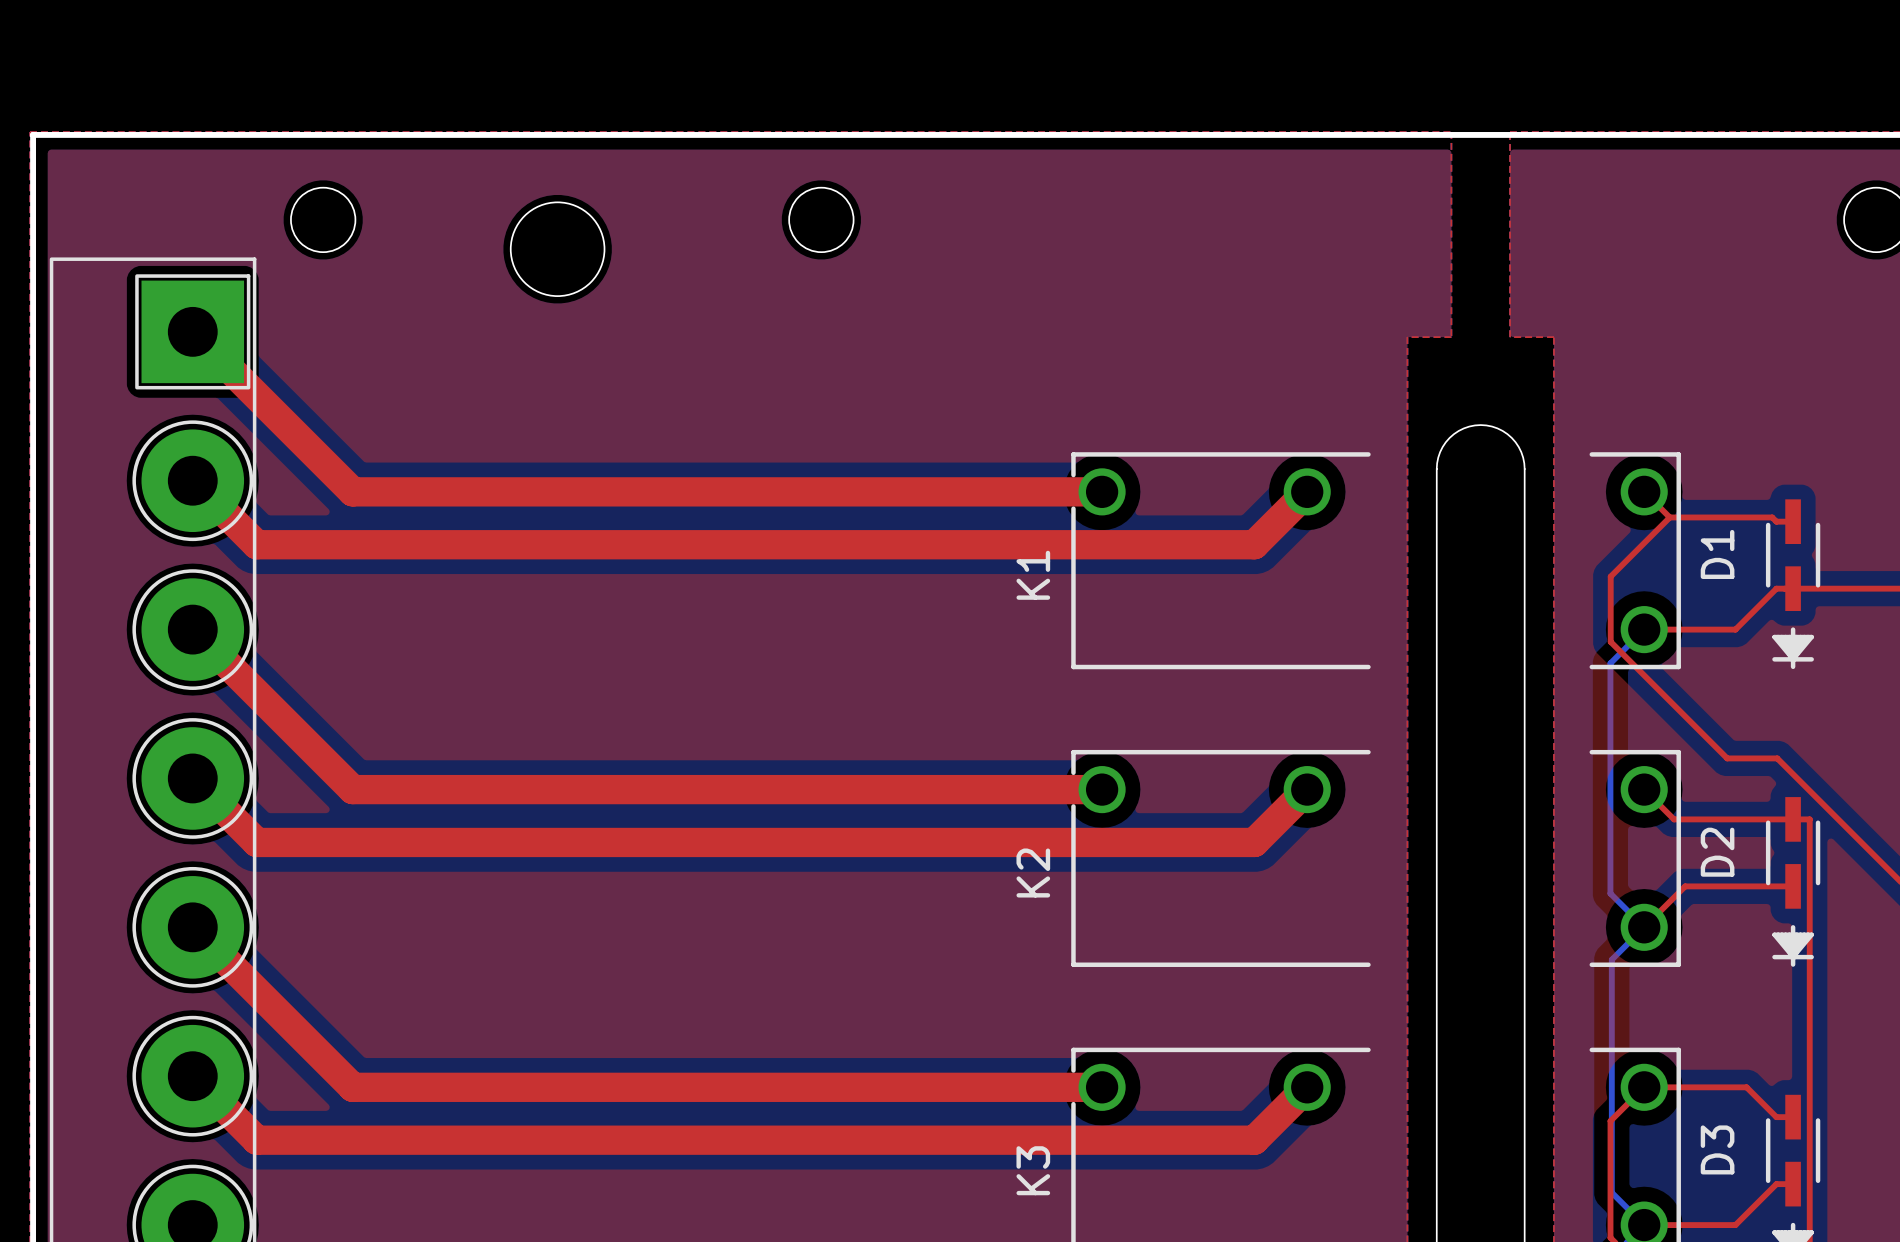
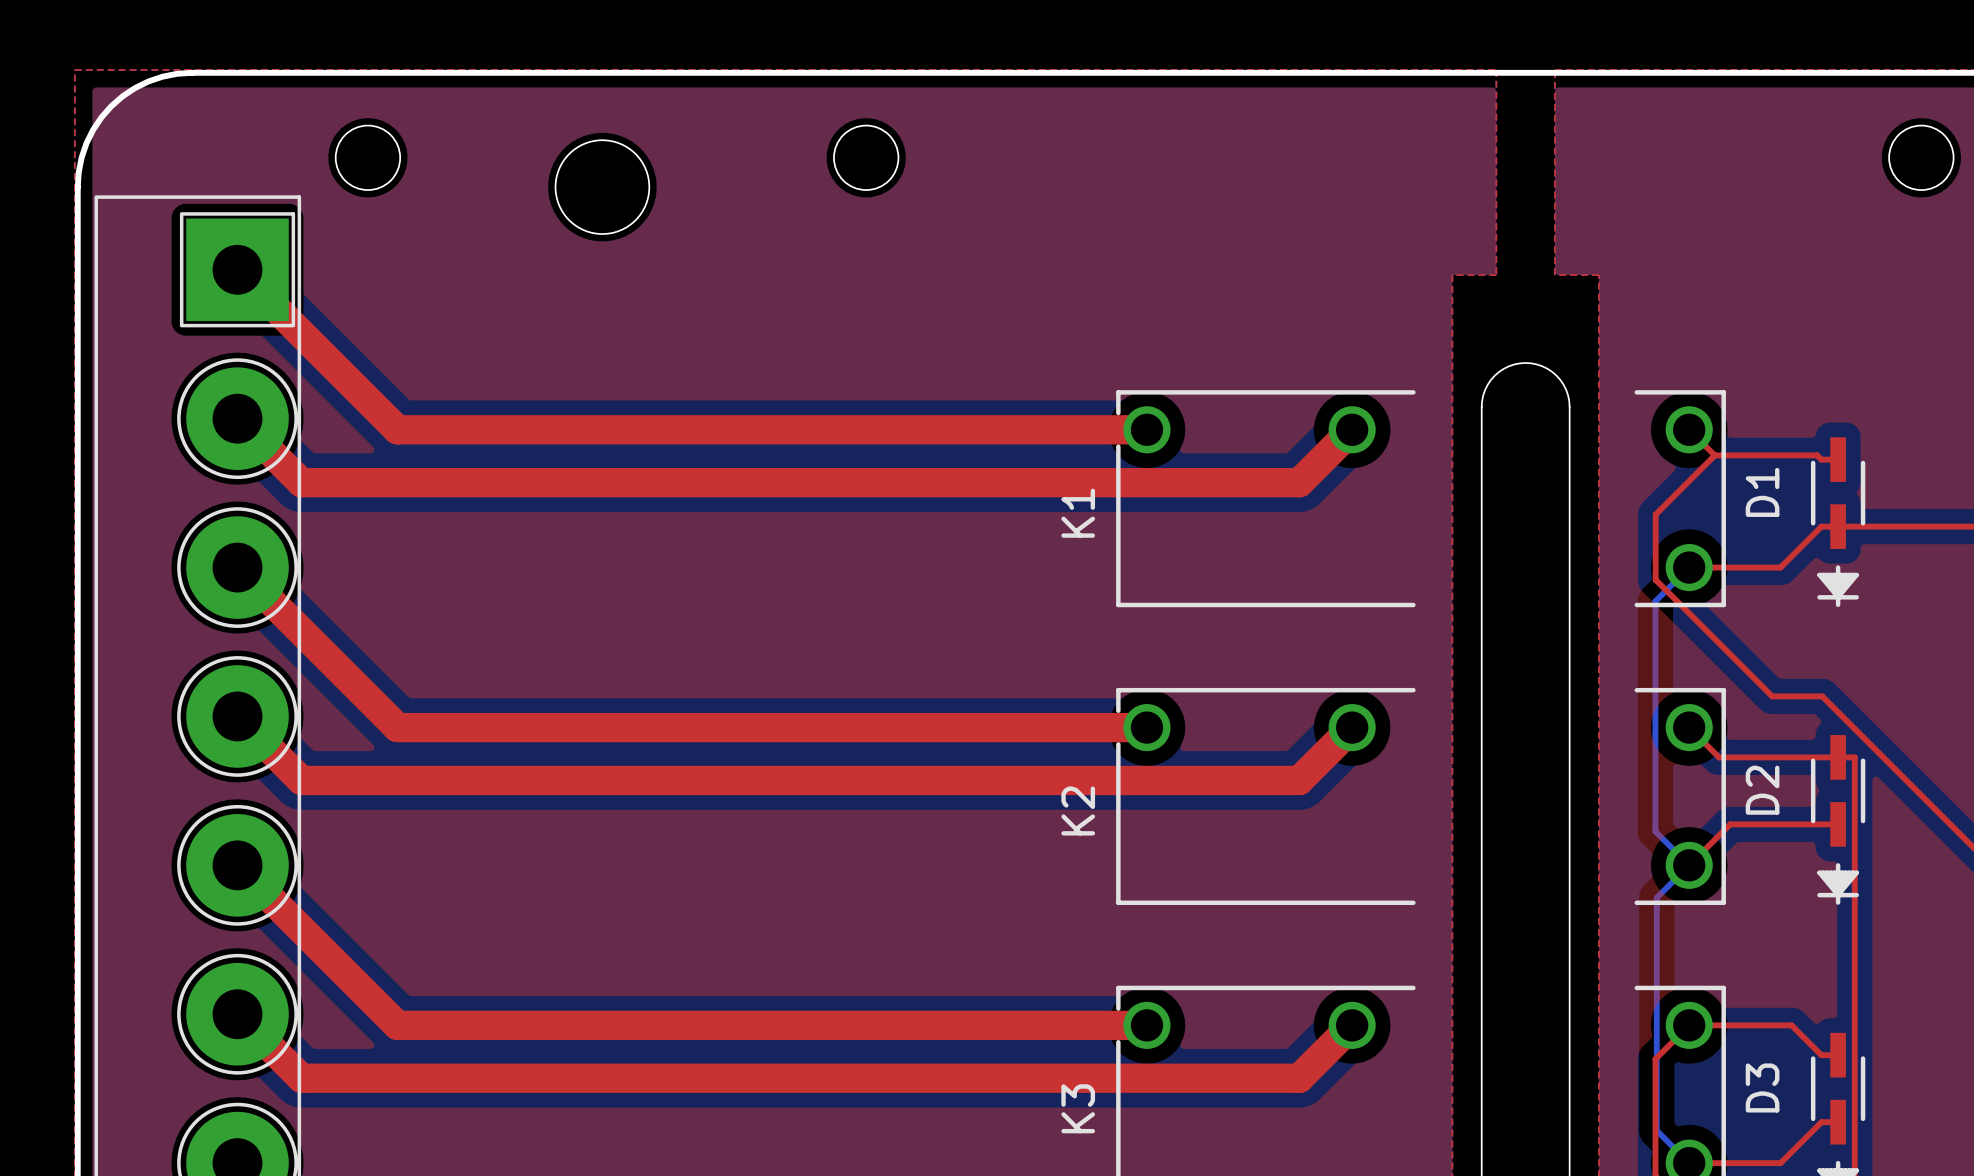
board edge: (147, 134) (33, 134) (33, 249) -> (192, 72) (162, 76) (148, 81) (122, 96) (111, 106) (93, 129) (86, 143) (81, 157) (77, 187)

